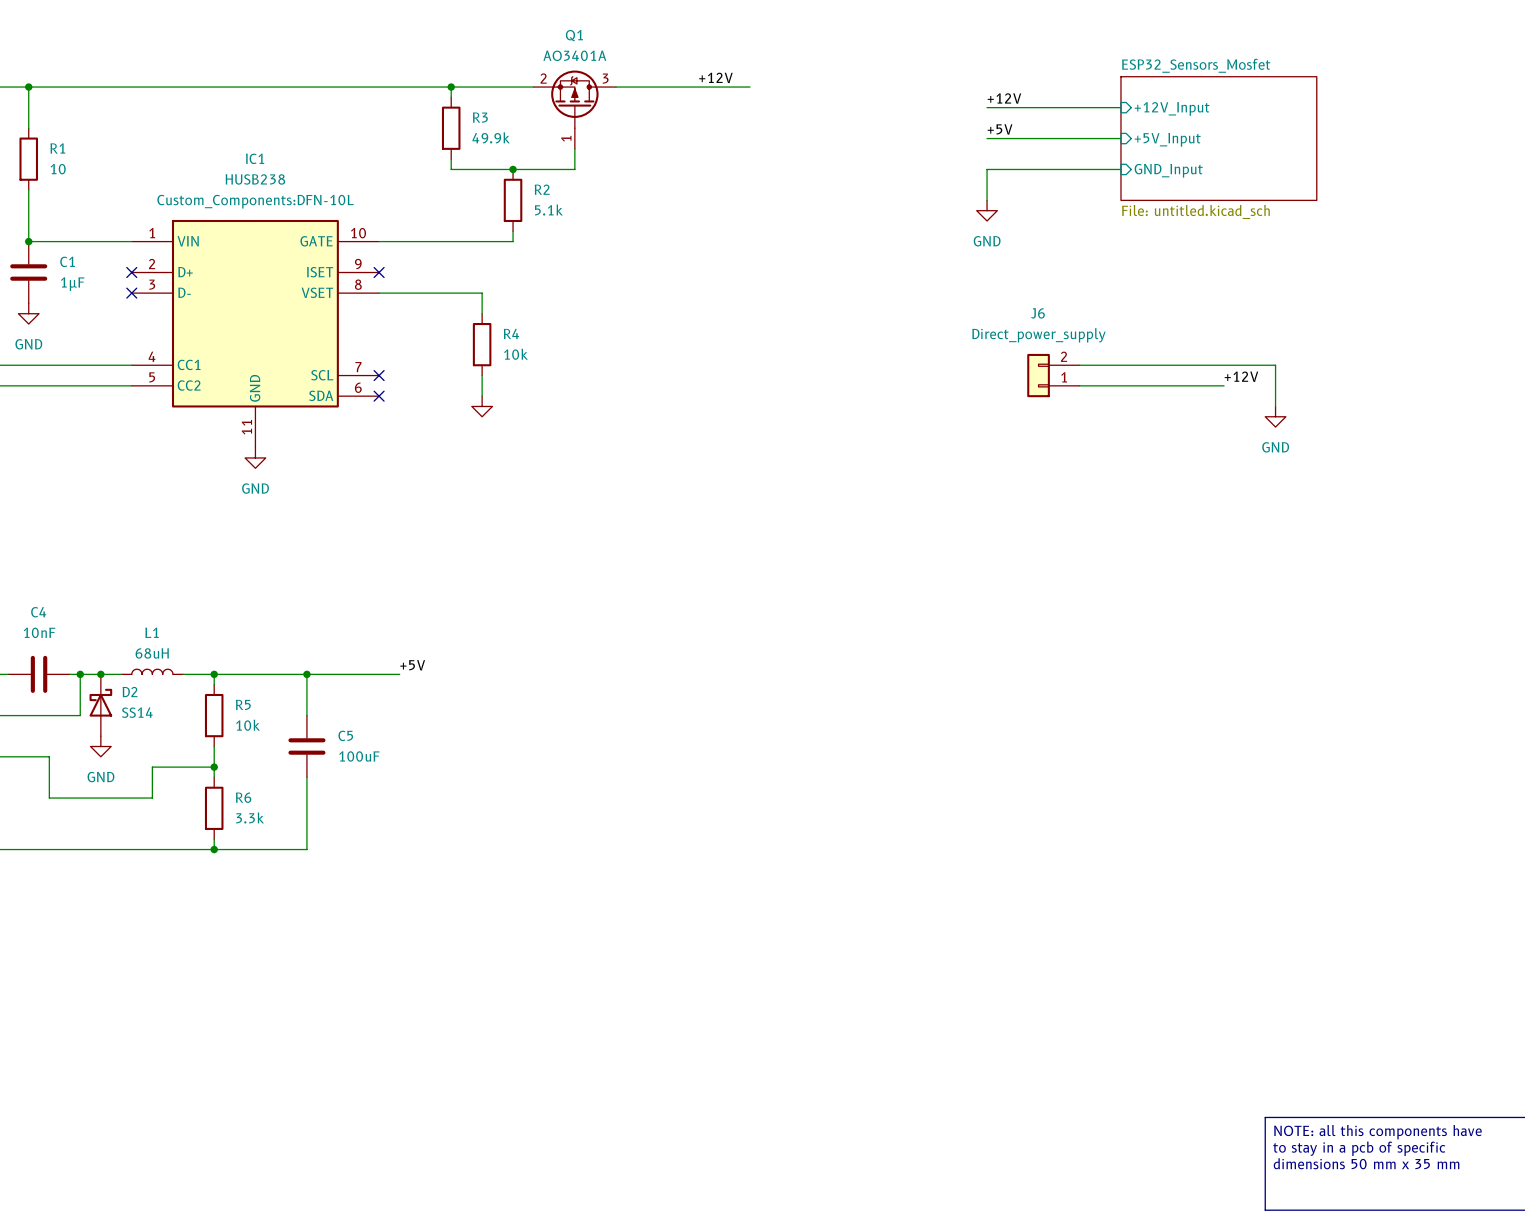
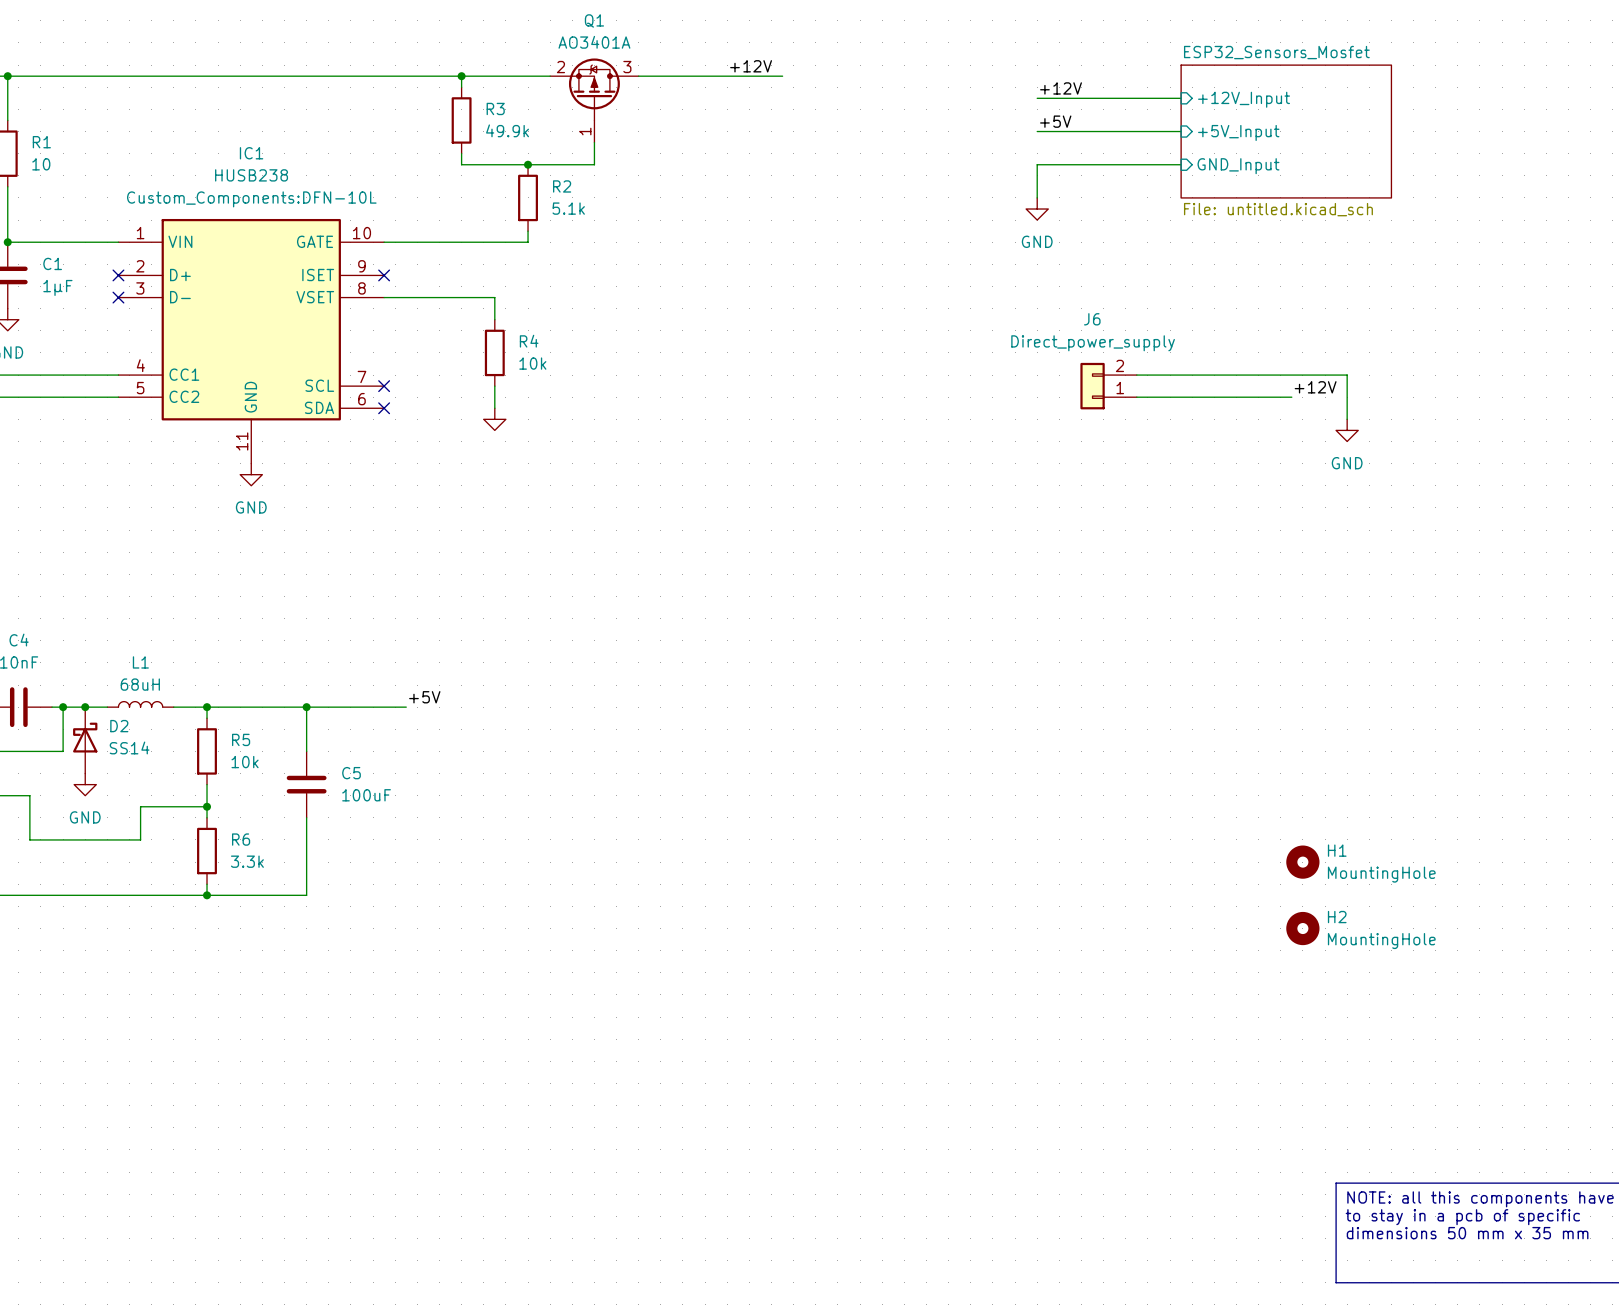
H1: none -> MountingHole (1302, 862)
H2: none -> MountingHole (1302, 928)

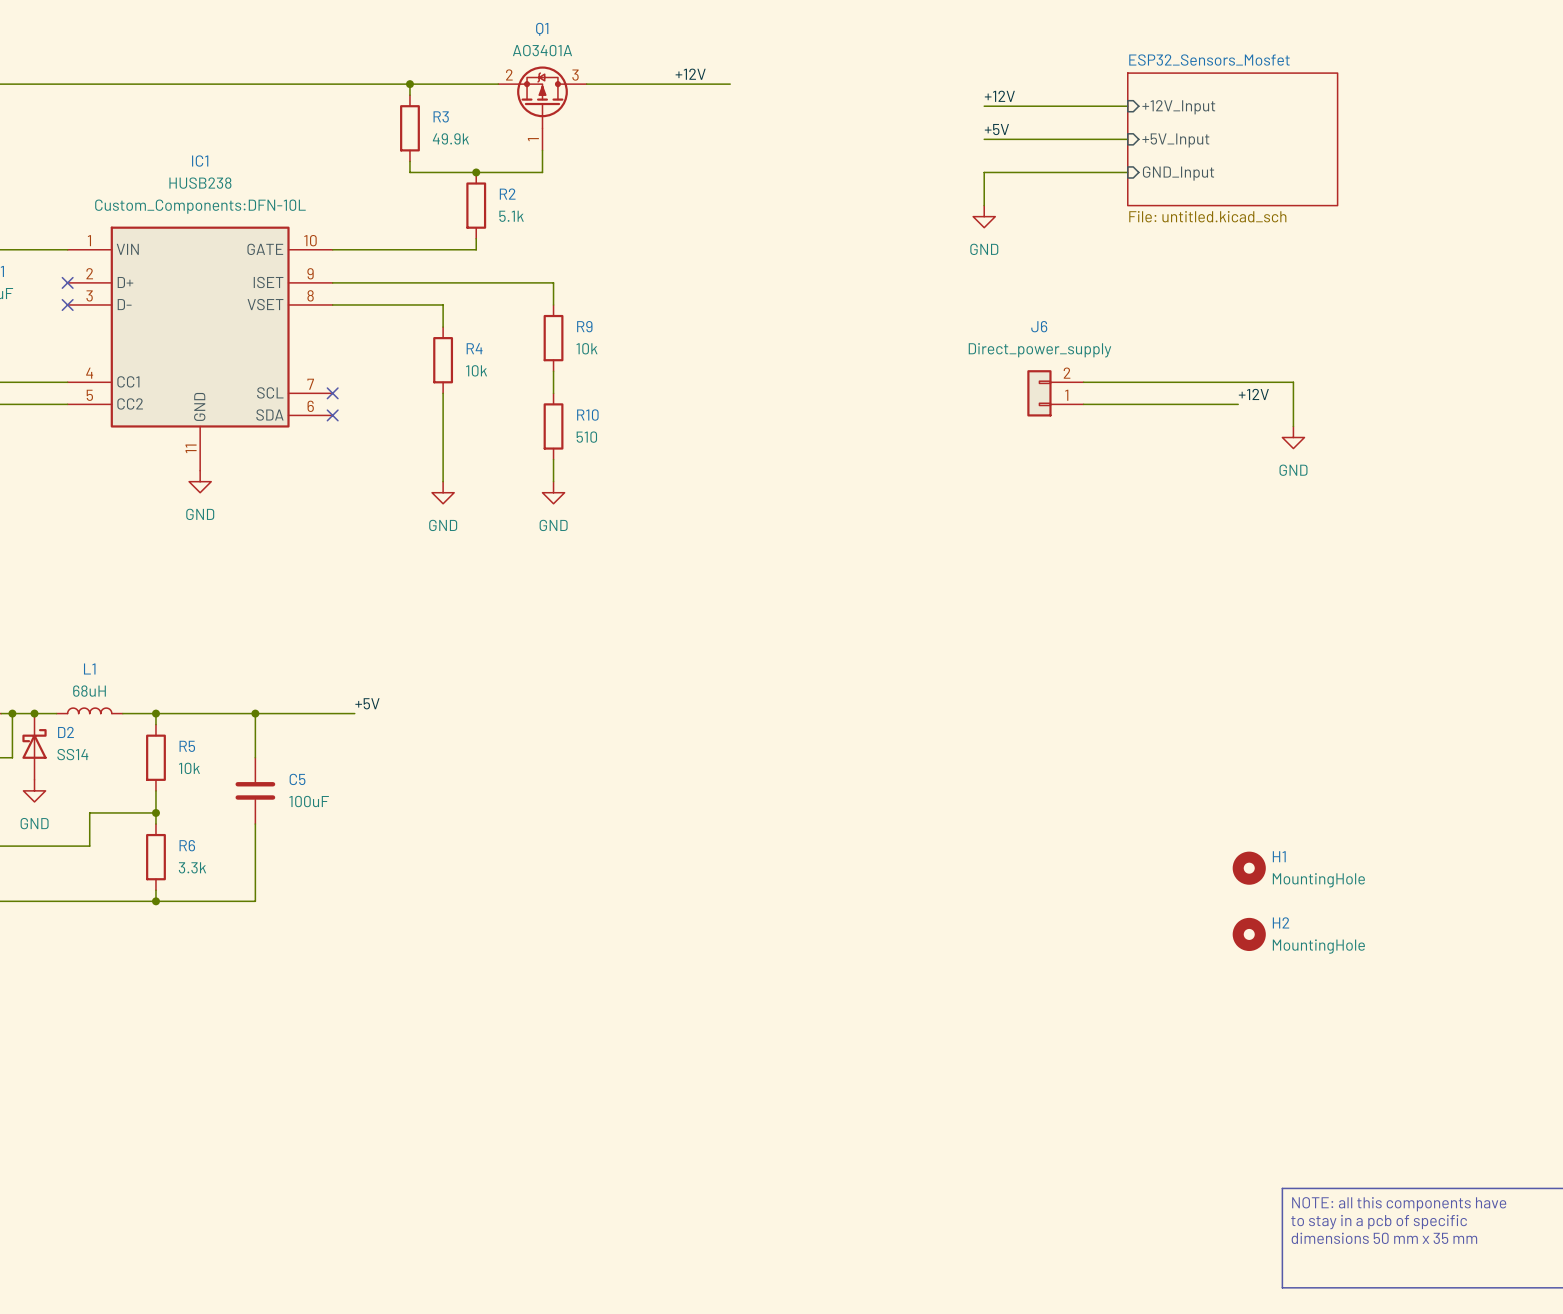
wire: none -> (332, 282) (553, 282) (553, 304)
no-connect mark: (384, 275) -> none
R9: none -> 10k (553, 338)
wire: none -> (553, 371) (553, 393)
wire: none -> (443, 415) (443, 481)
power symbol: (494, 419) -> none
R10: none -> 510 (553, 426)
wire: none -> (553, 459) (553, 481)
power symbol: none -> GND (443, 492)
power symbol: none -> GND (553, 492)

